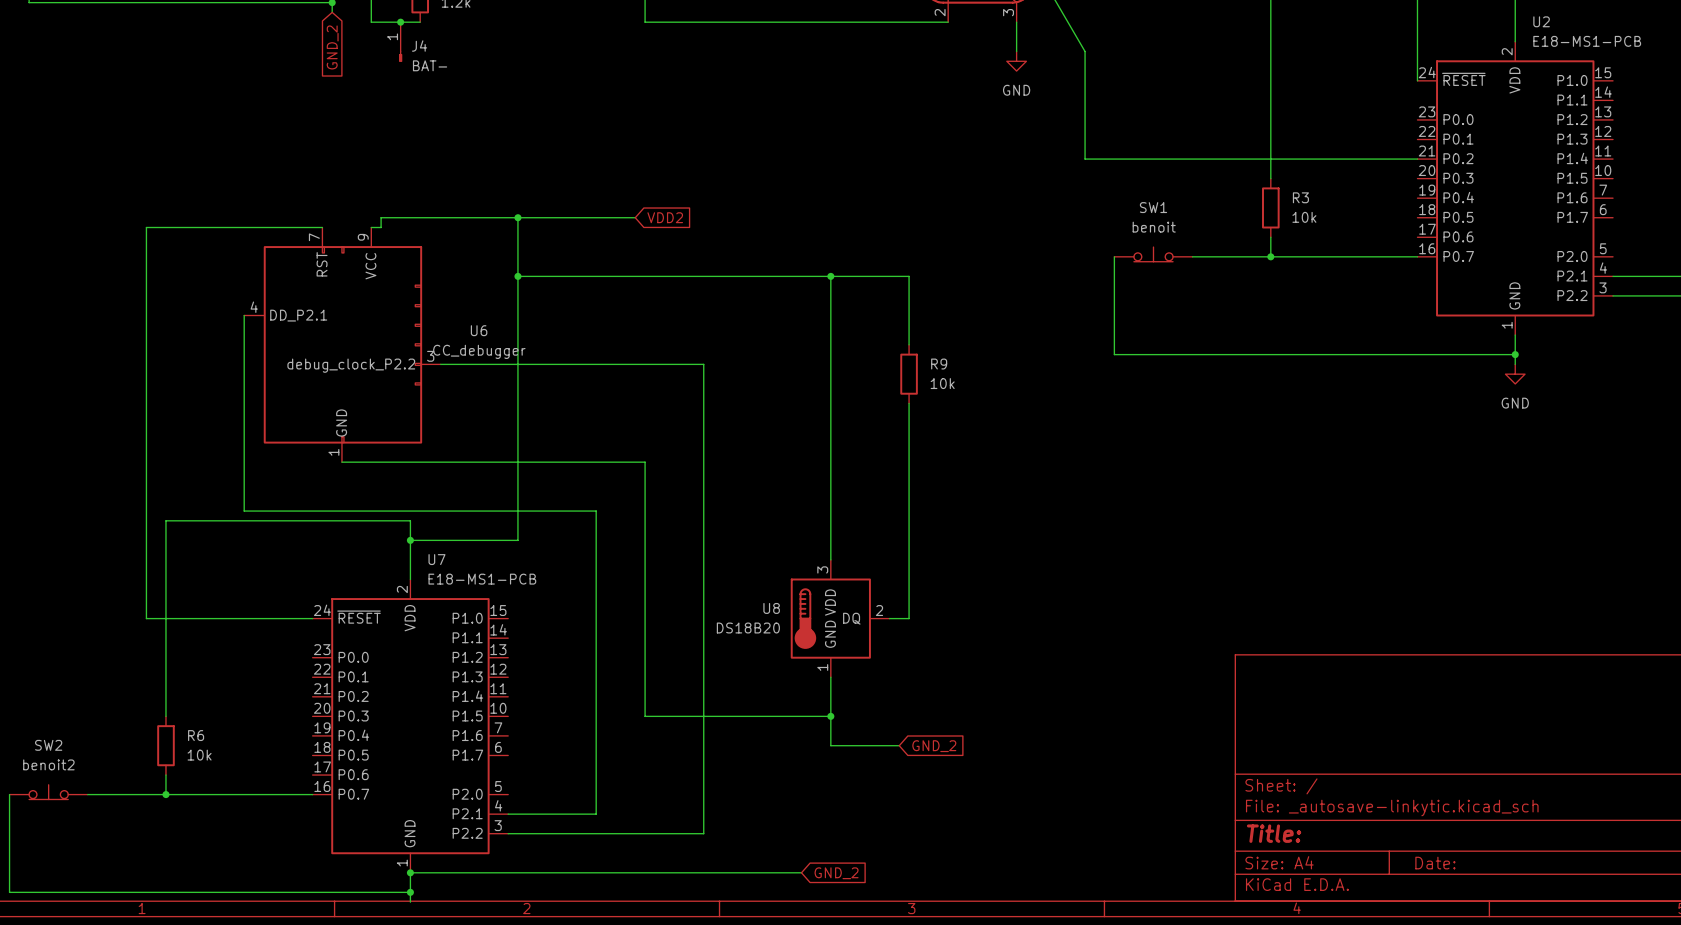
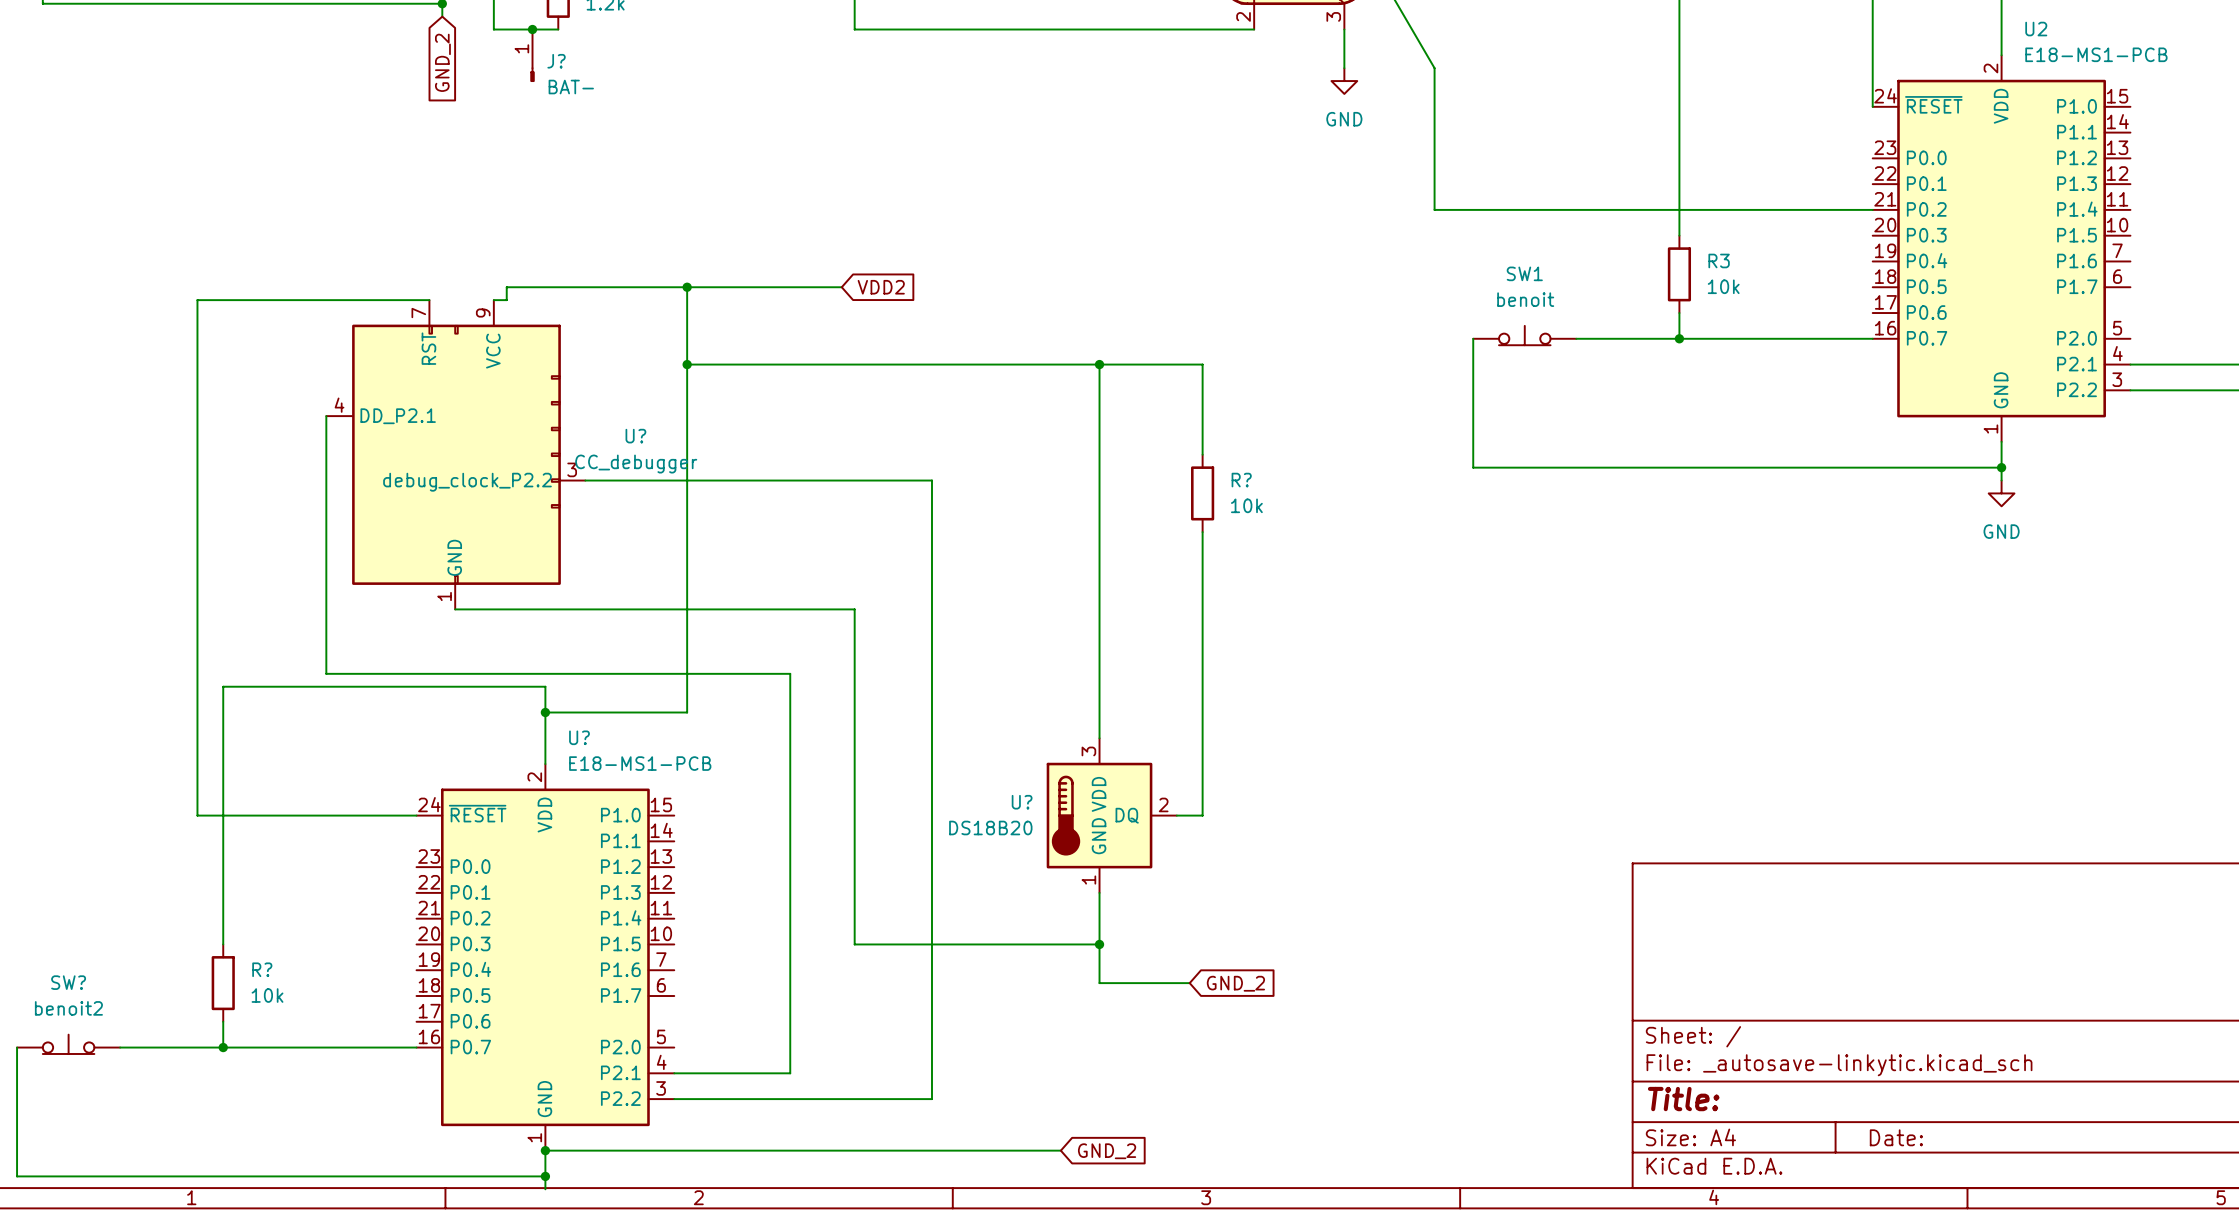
J4 name: J4 (419, 46) -> J? (556, 61)
U6 name: U6 (479, 330) -> U? (635, 436)
R9 name: R9 (939, 364) -> R? (1241, 480)
U7 name: U7 (436, 559) -> U? (579, 737)
U8 name: U8 (771, 608) -> U? (1022, 802)
R6 name: R6 (196, 735) -> R? (262, 969)
SW2 name: SW2 (48, 745) -> SW? (68, 982)

